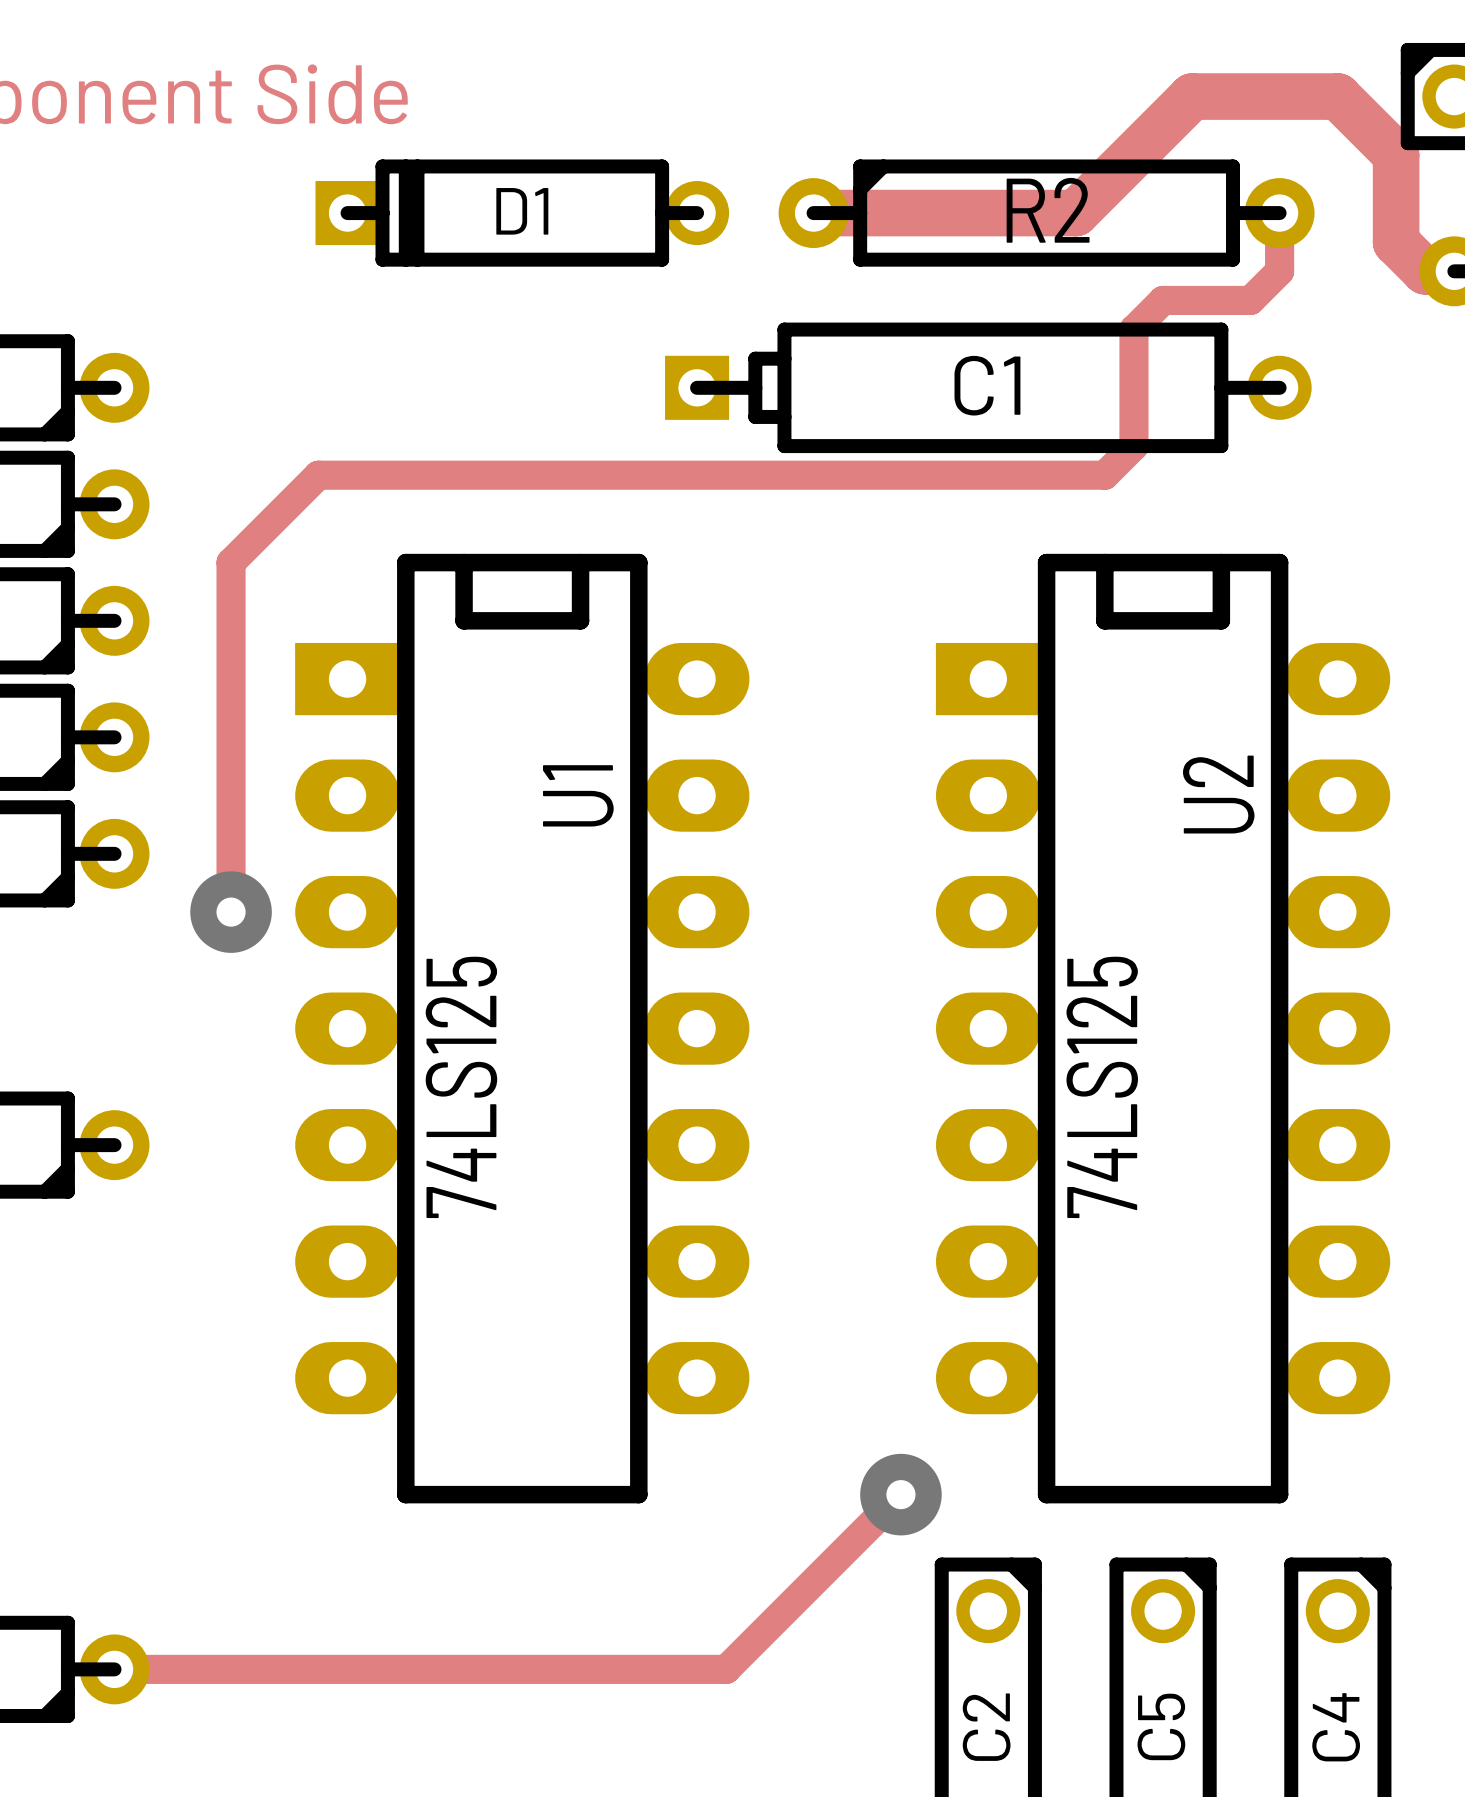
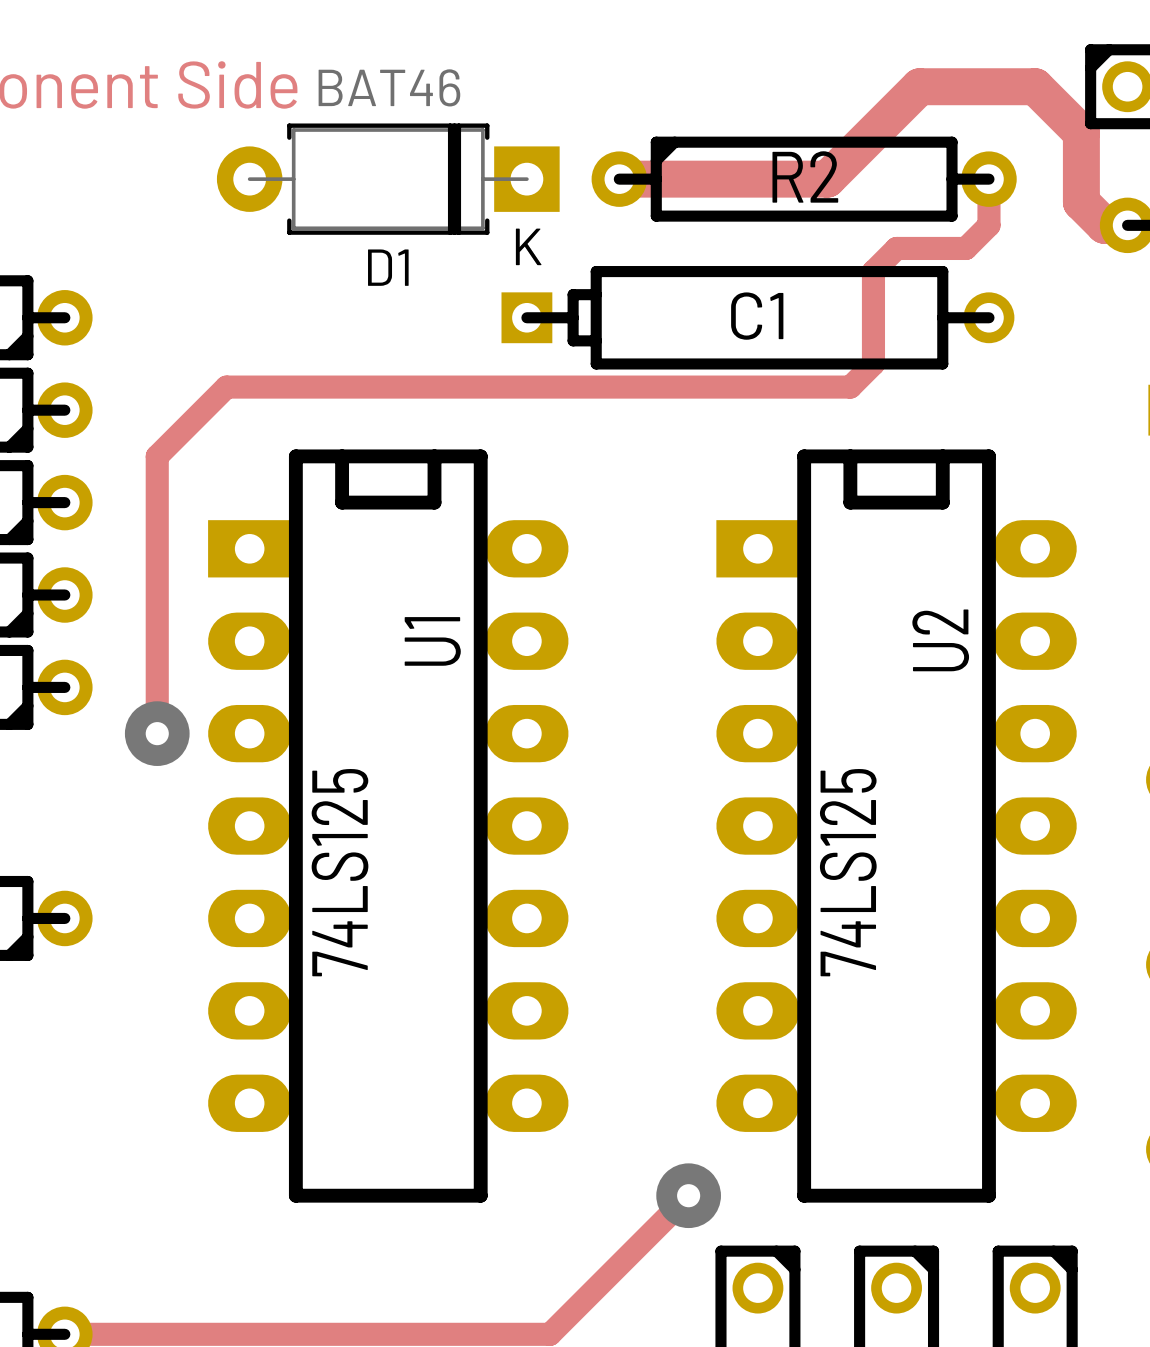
D1 value: none -> BAT46 (389, 87)
D1 footprint: [315, 159, 730, 267] -> [216, 123, 560, 235]
D1 name position: D1 (522, 211) -> D1 (388, 267)

